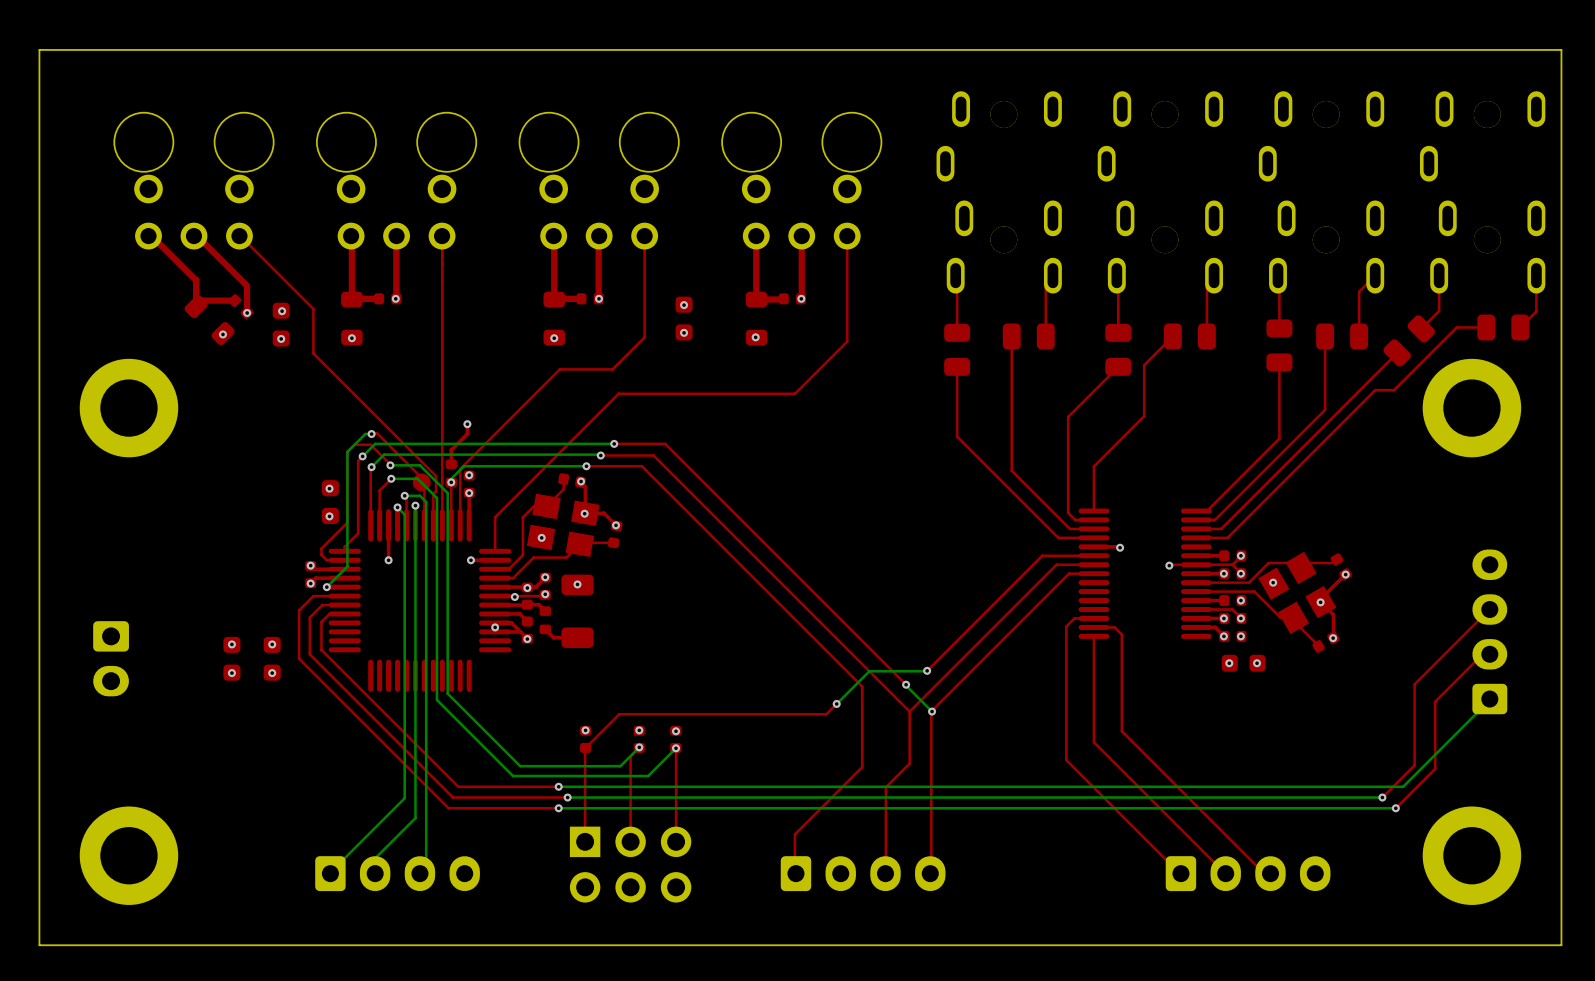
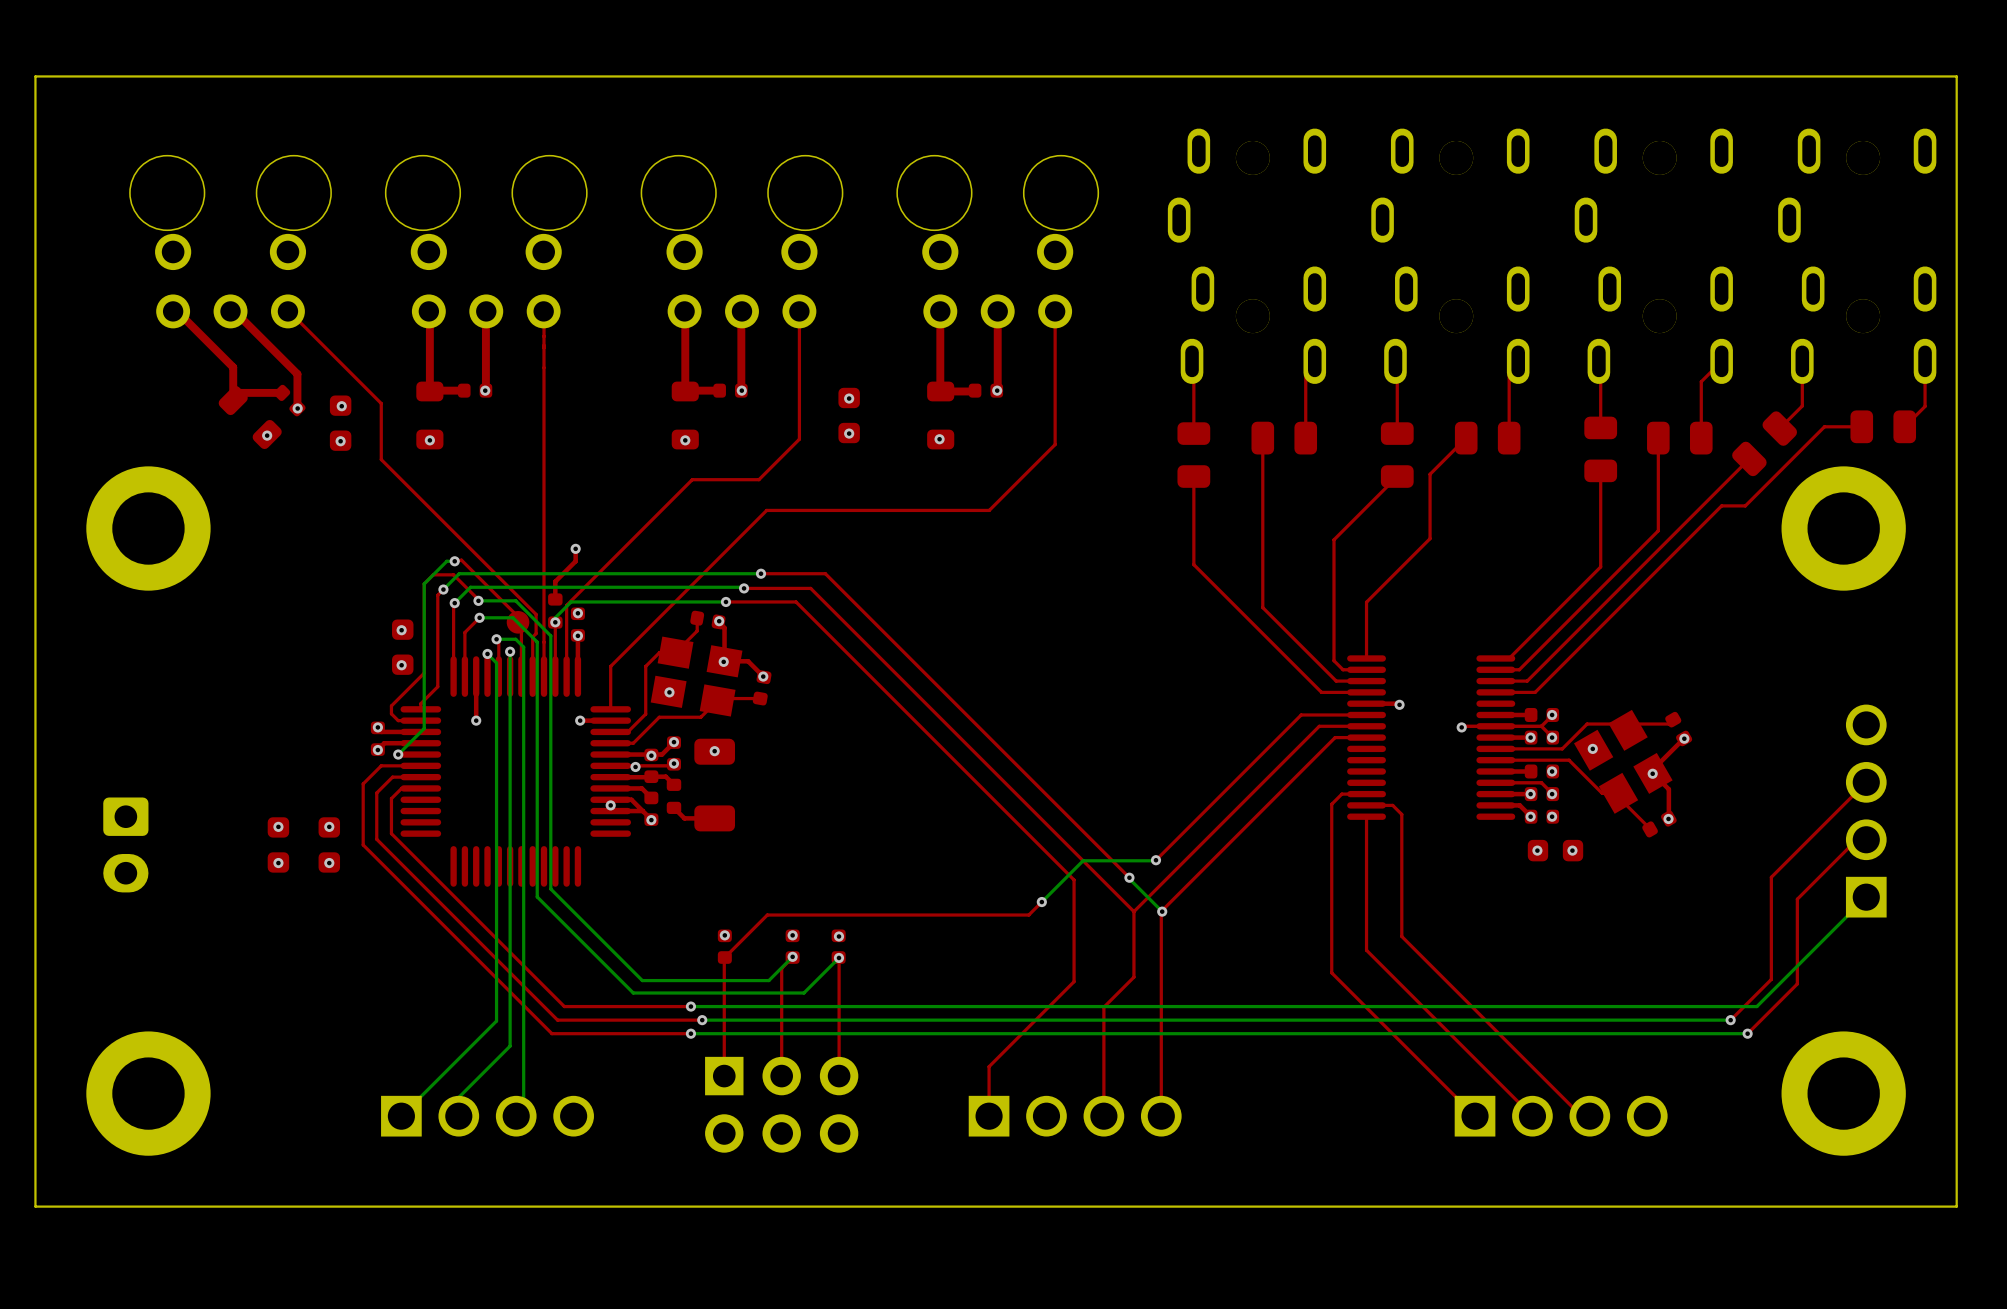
part footprint: [1472, 549, 1508, 715] -> [1845, 704, 1887, 918]
part footprint: [315, 856, 480, 892] -> [381, 1095, 594, 1137]
part footprint: [780, 856, 946, 892] -> [968, 1095, 1182, 1137]
part footprint: [1165, 856, 1331, 892] -> [1454, 1095, 1668, 1137]

